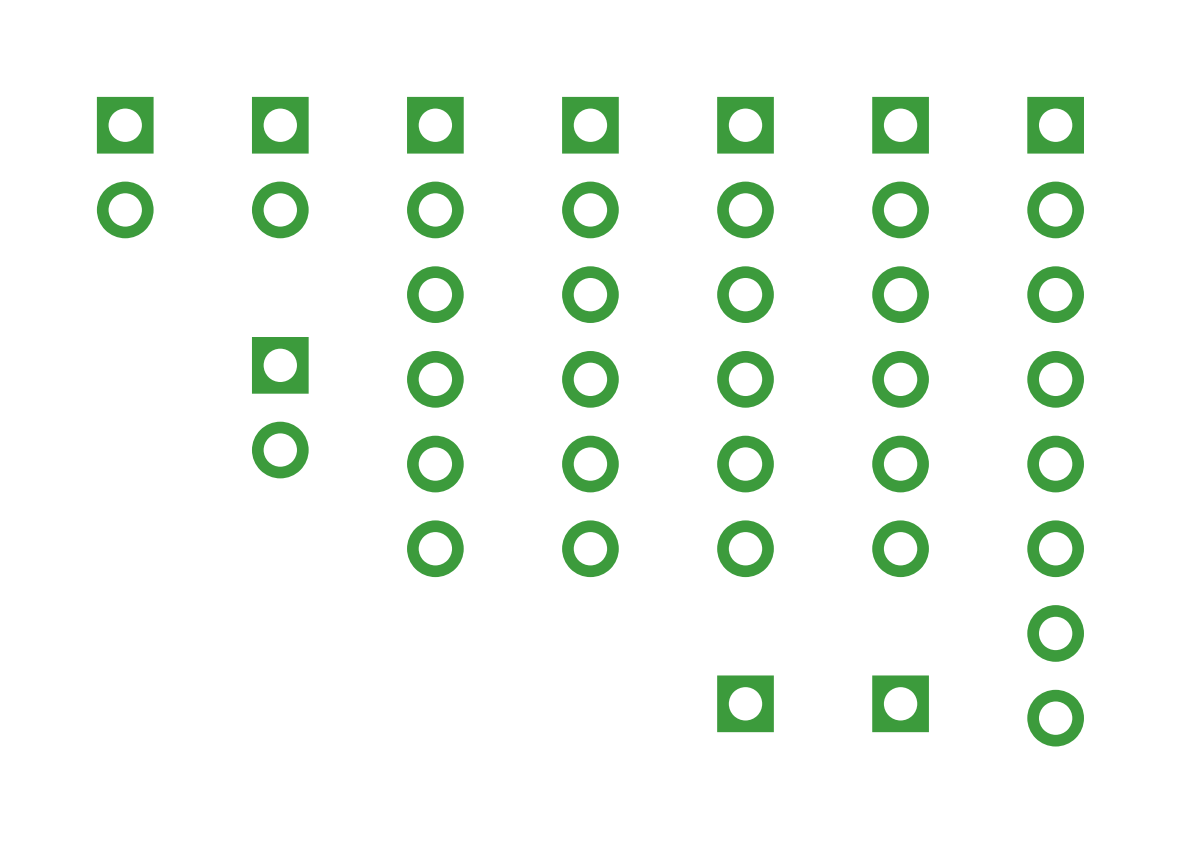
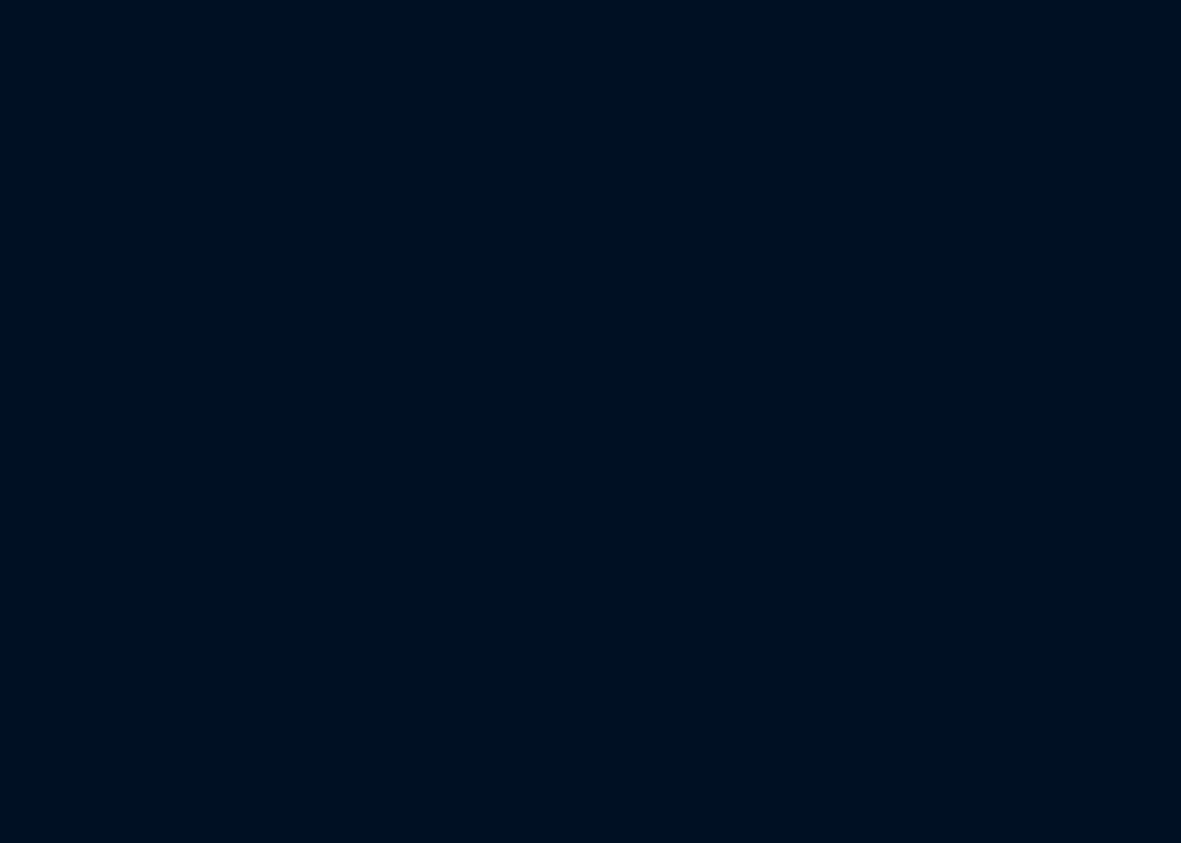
part: (125, 167) -> none
part: (280, 167) -> none
part: (435, 337) -> none
part: (590, 337) -> none
part: (745, 337) -> none
part: (900, 337) -> none
part: (280, 407) -> none
part: (1055, 421) -> none
part: (745, 703) -> none
part: (900, 703) -> none

